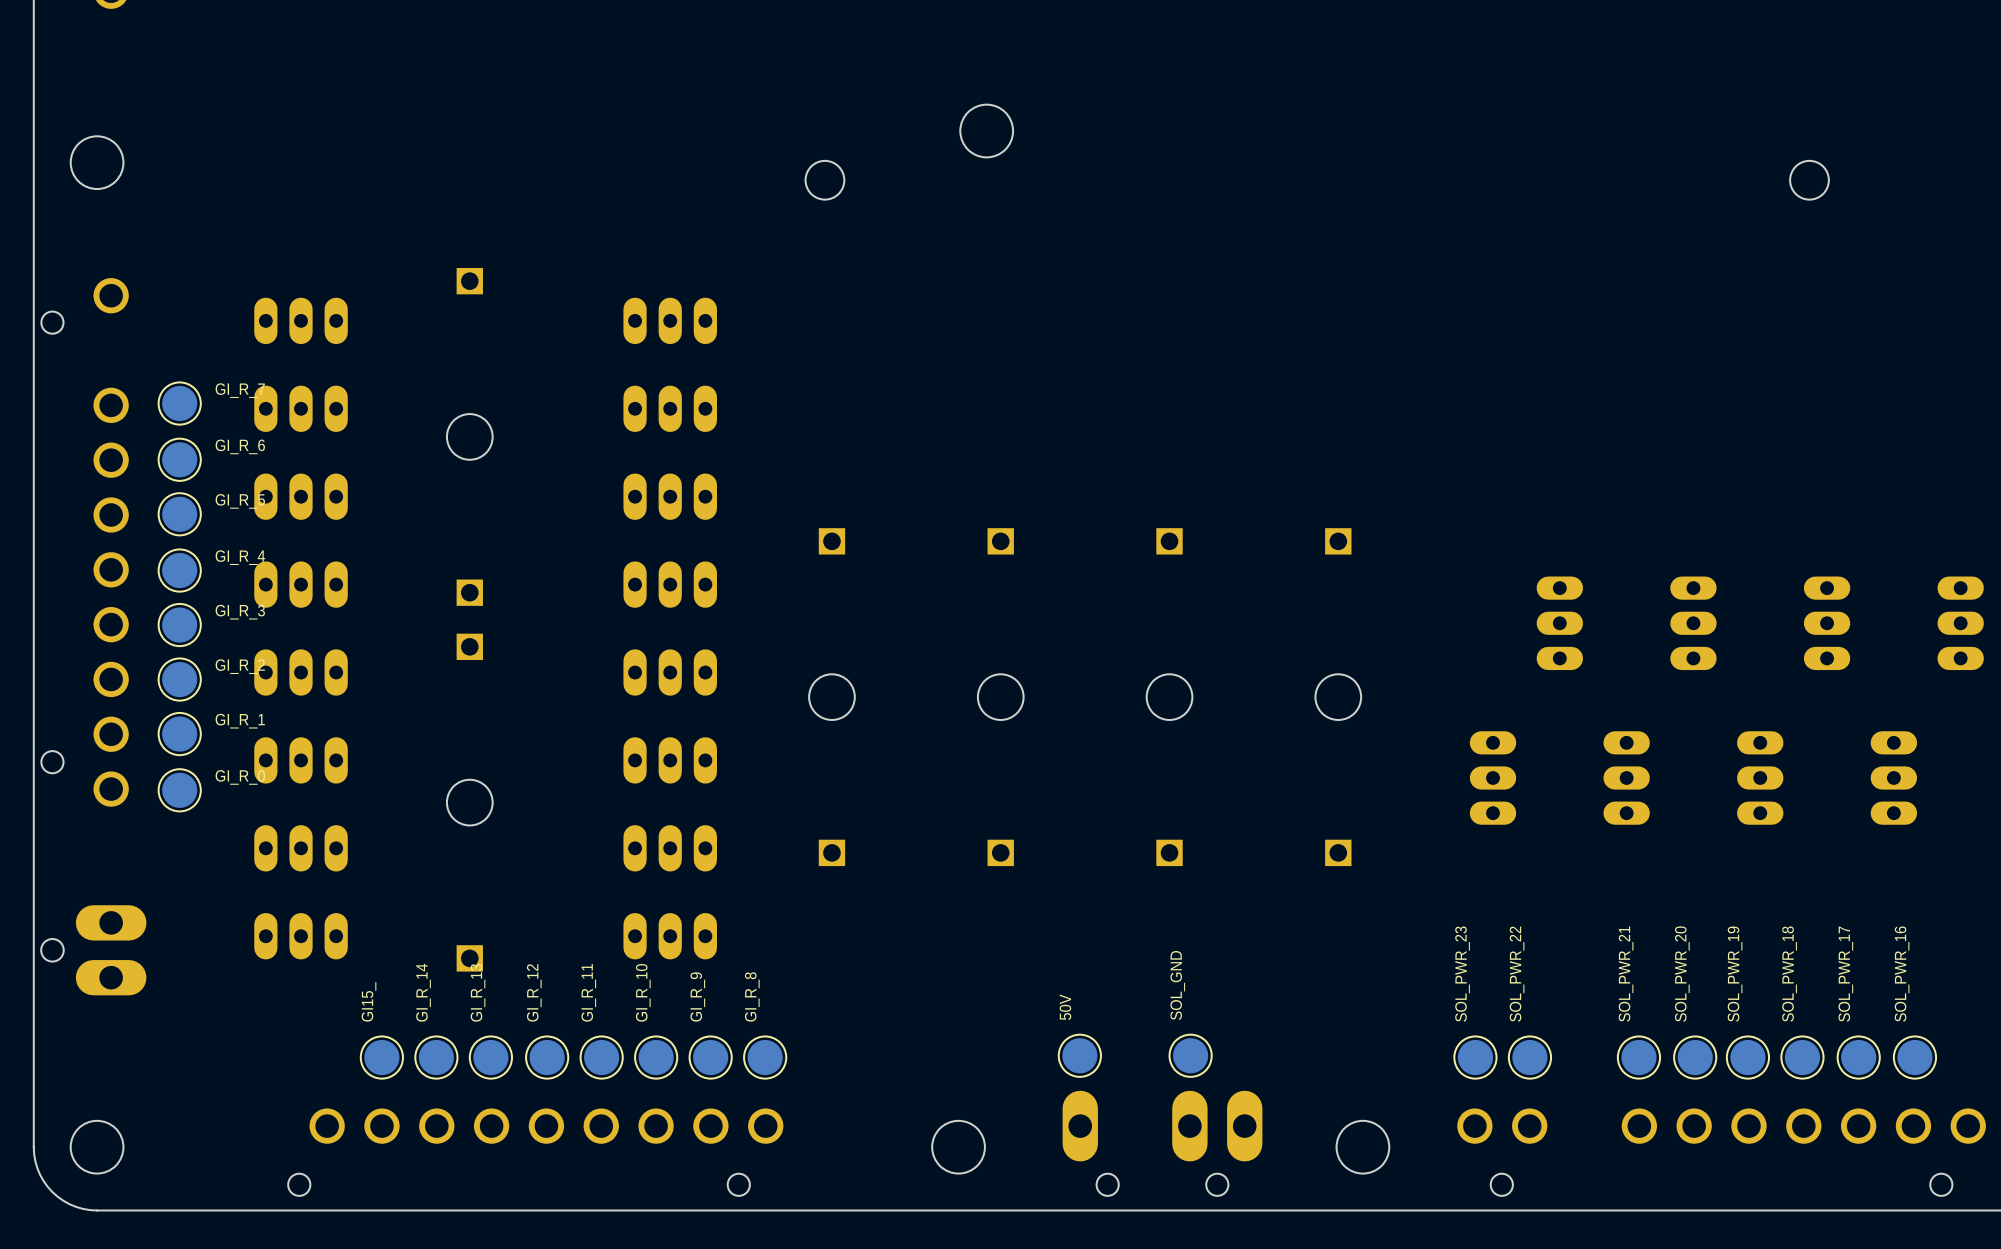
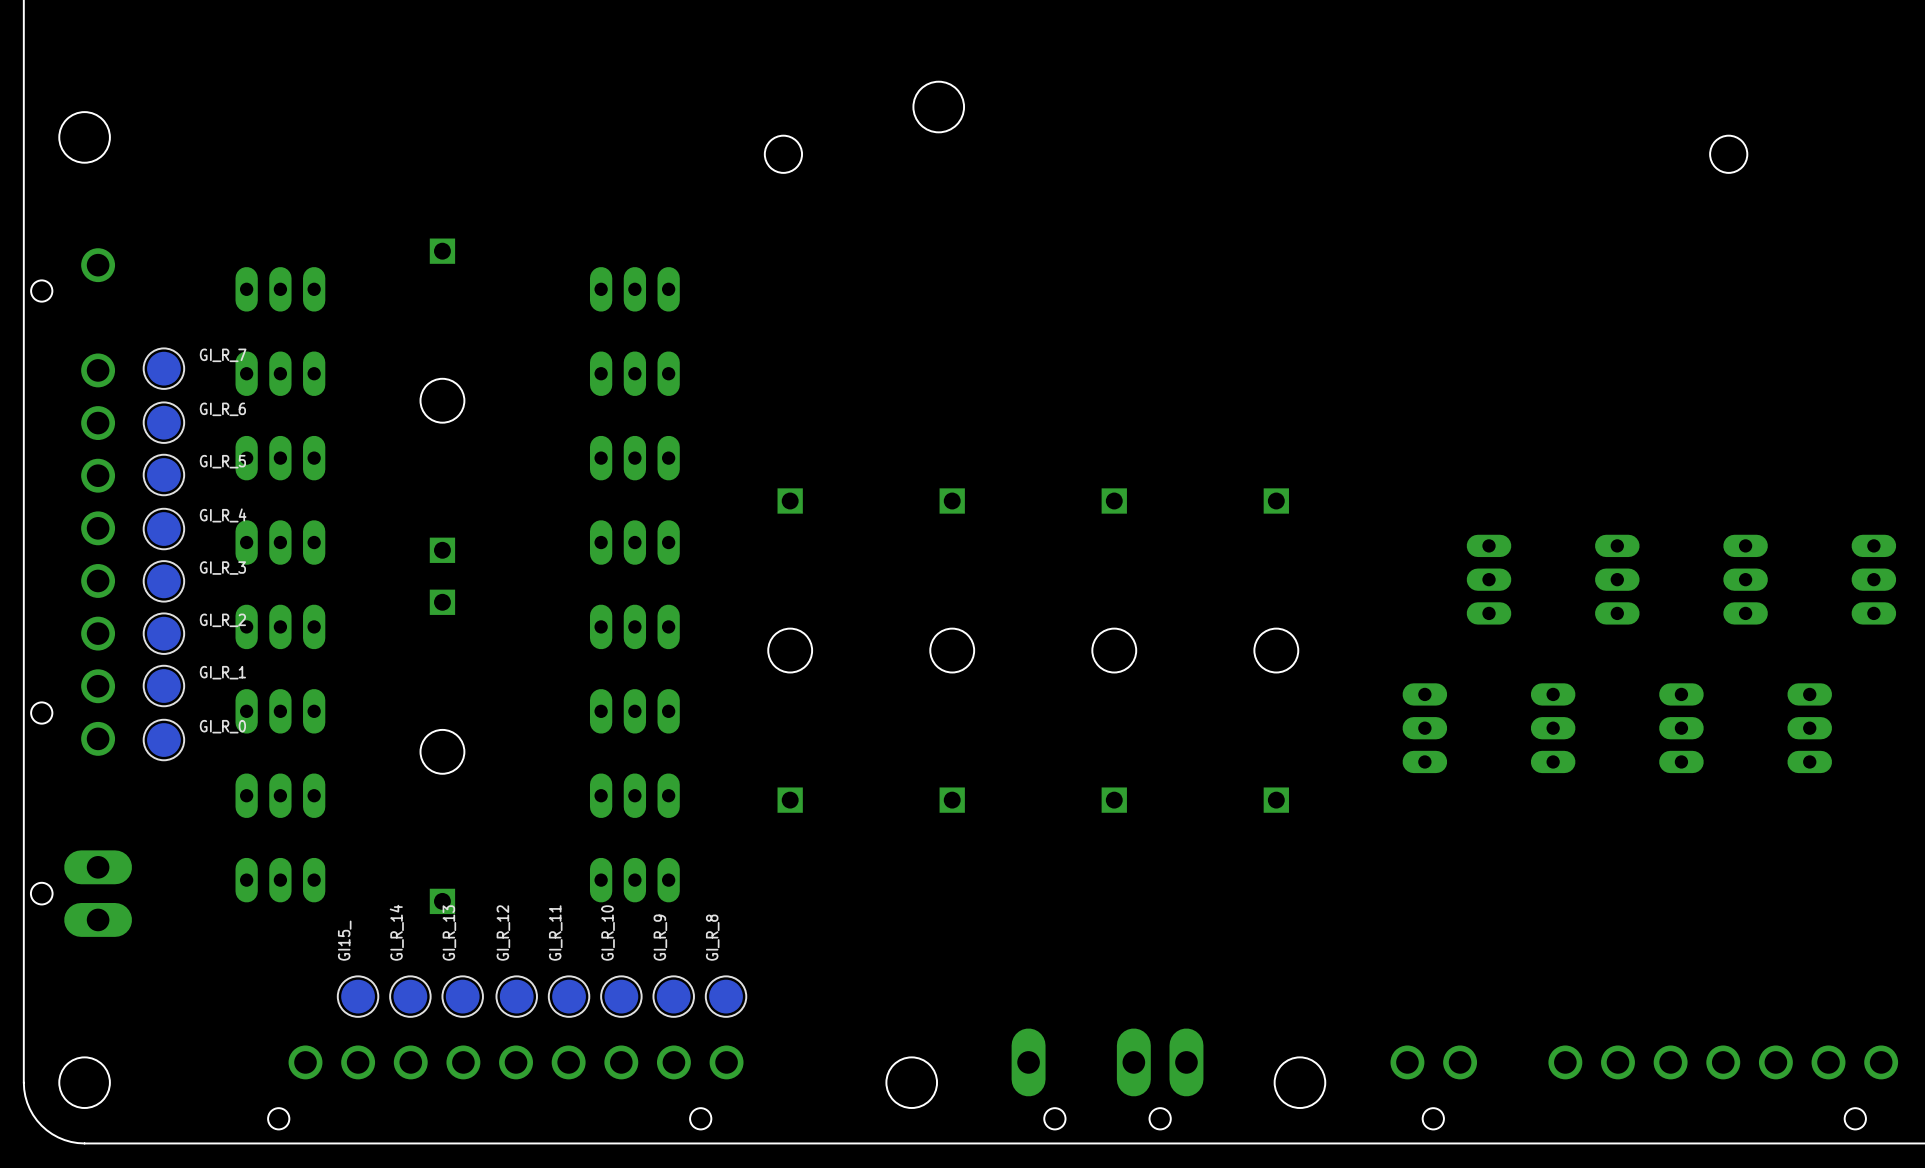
50V: (1079, 1055) -> none
SOL_GND: (1190, 1055) -> none
SOL_PWR_23: (1475, 1057) -> none
SOL_PWR_22: (1529, 1057) -> none
SOL_PWR_21: (1638, 1057) -> none
SOL_PWR_20: (1695, 1057) -> none
SOL_PWR_19: (1747, 1057) -> none
SOL_PWR_18: (1802, 1057) -> none
SOL_PWR_17: (1858, 1057) -> none
SOL_PWR_16: (1914, 1057) -> none

